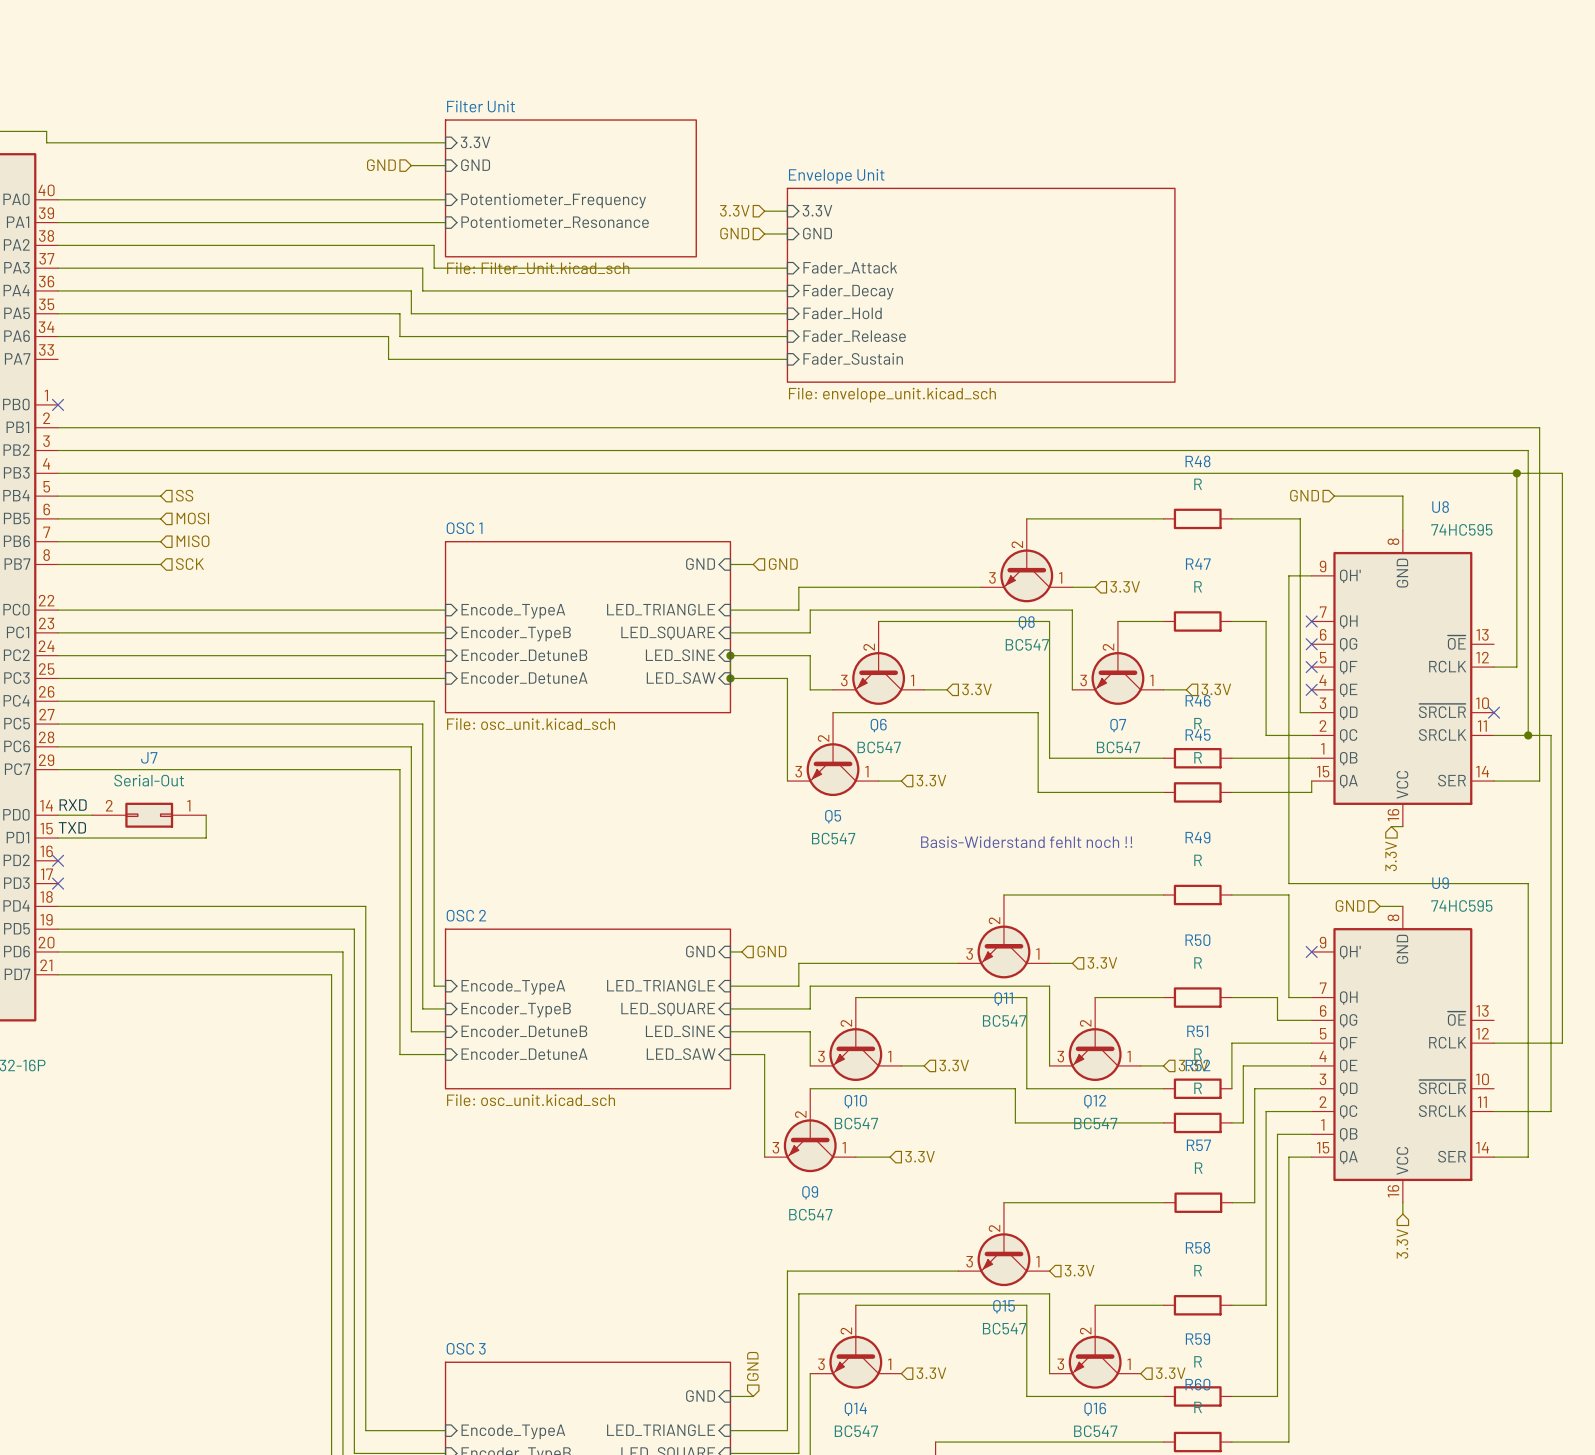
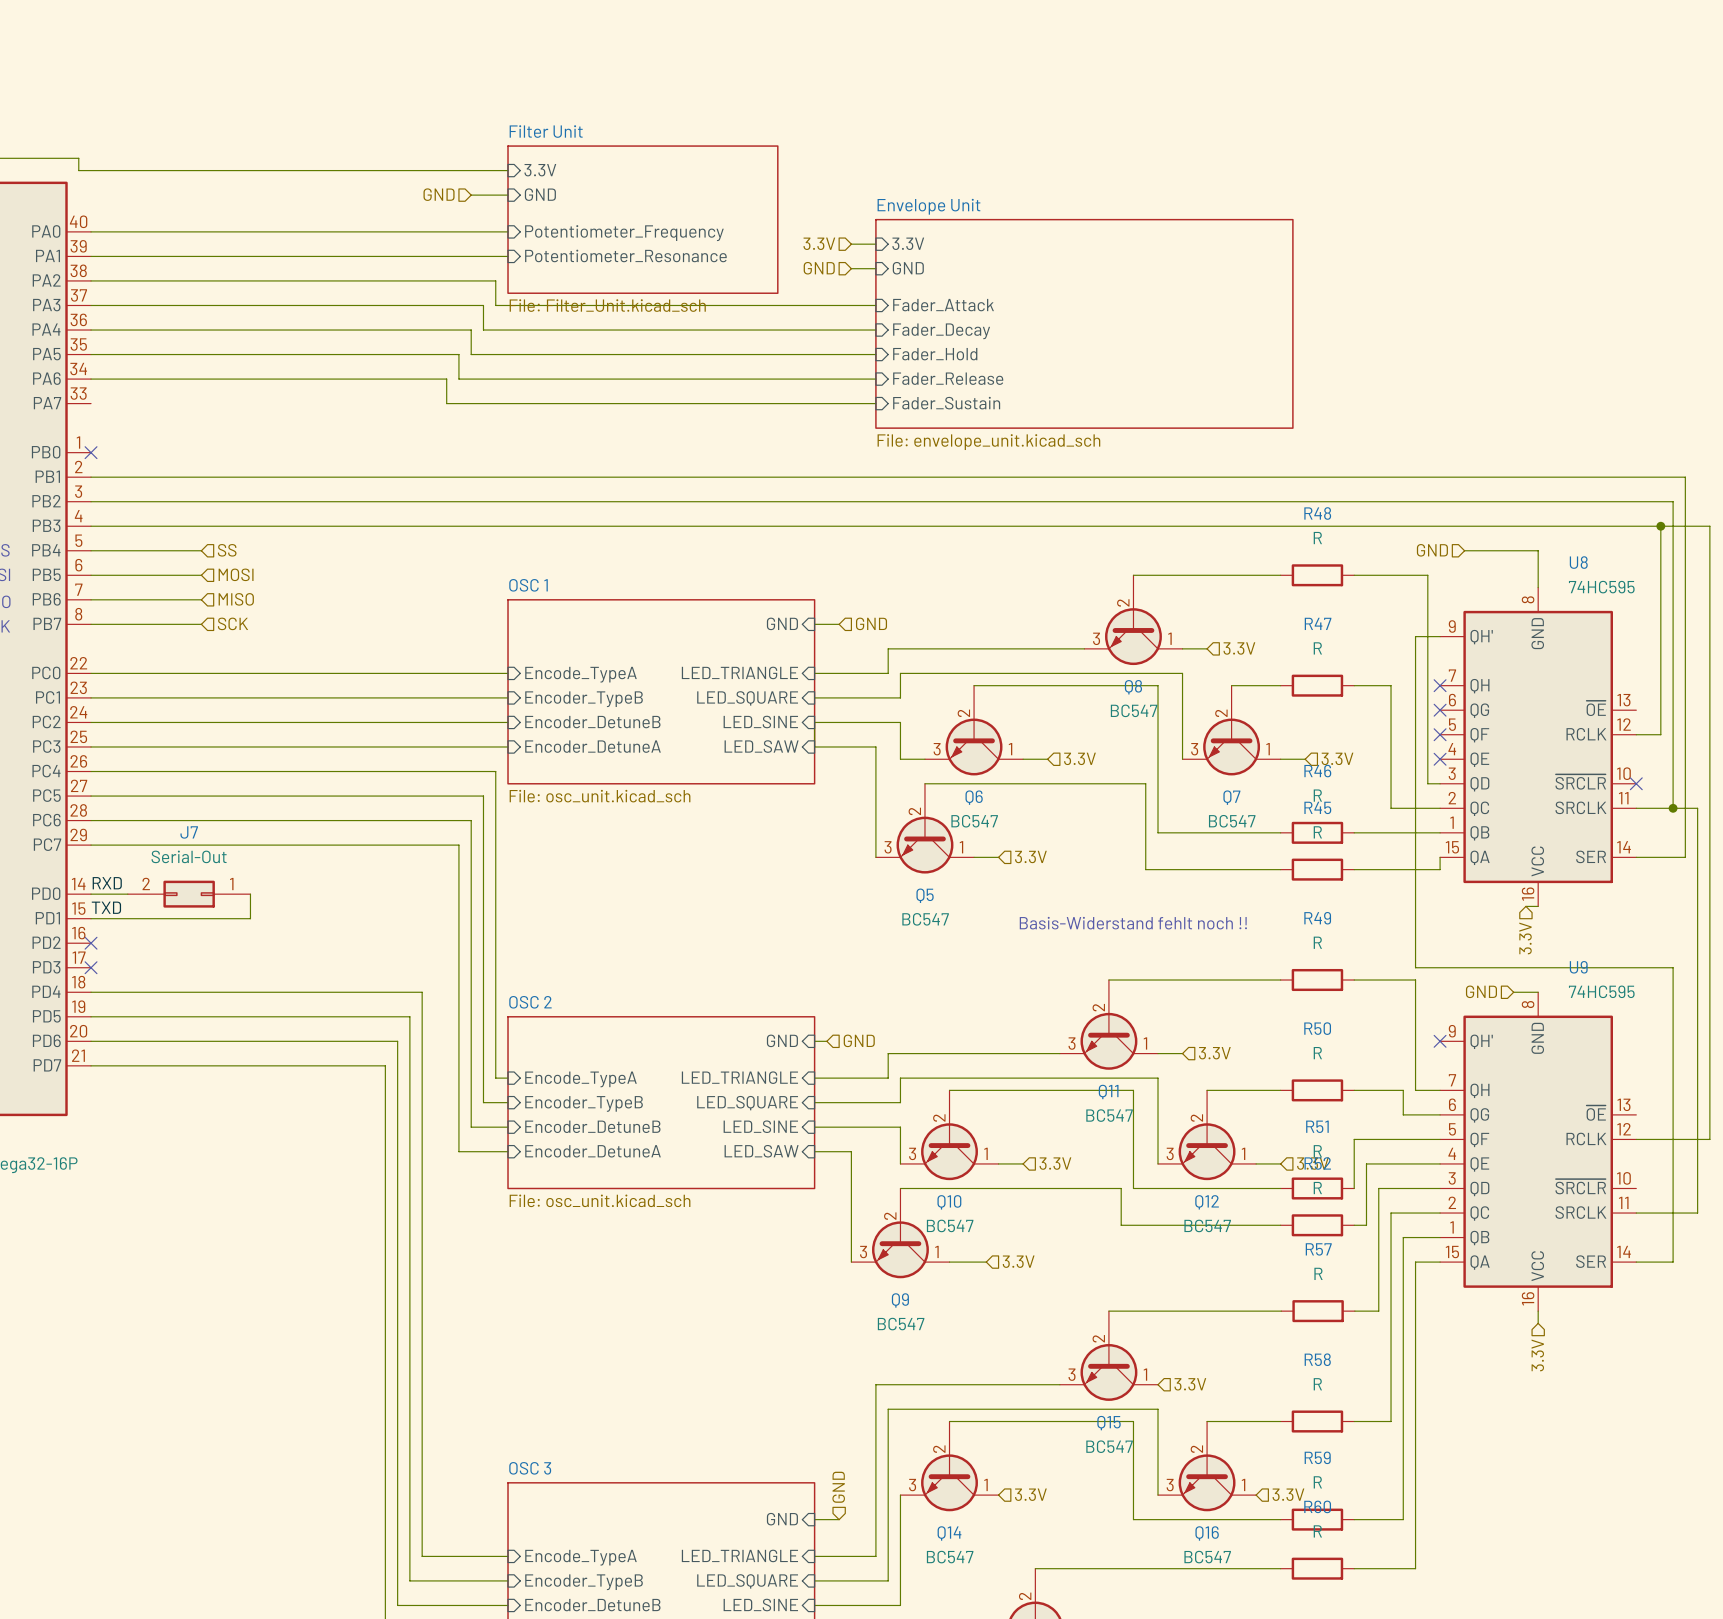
junction: (730, 655) -> none
junction: (730, 678) -> none

